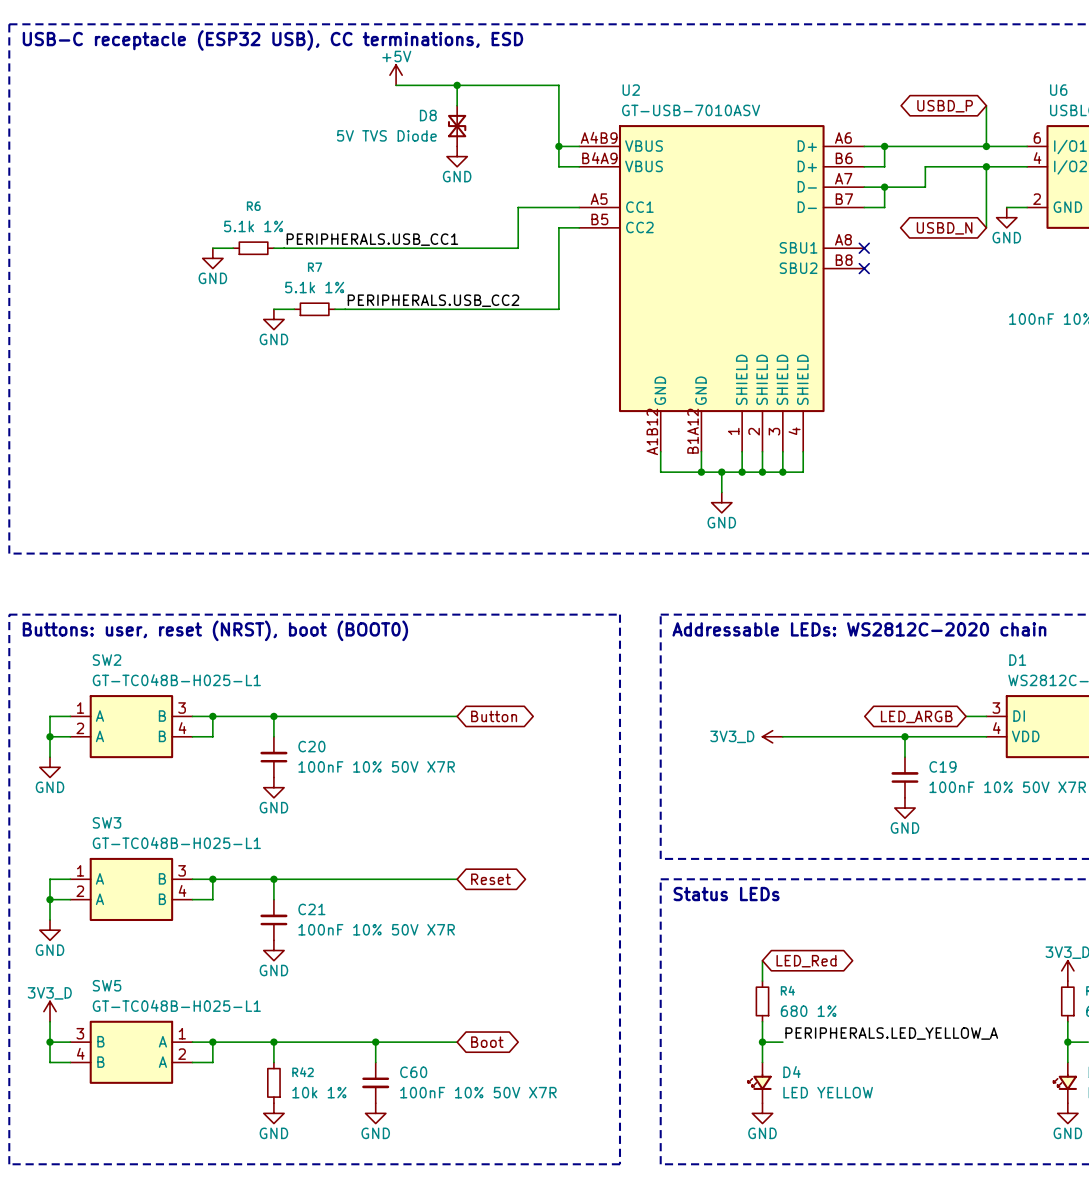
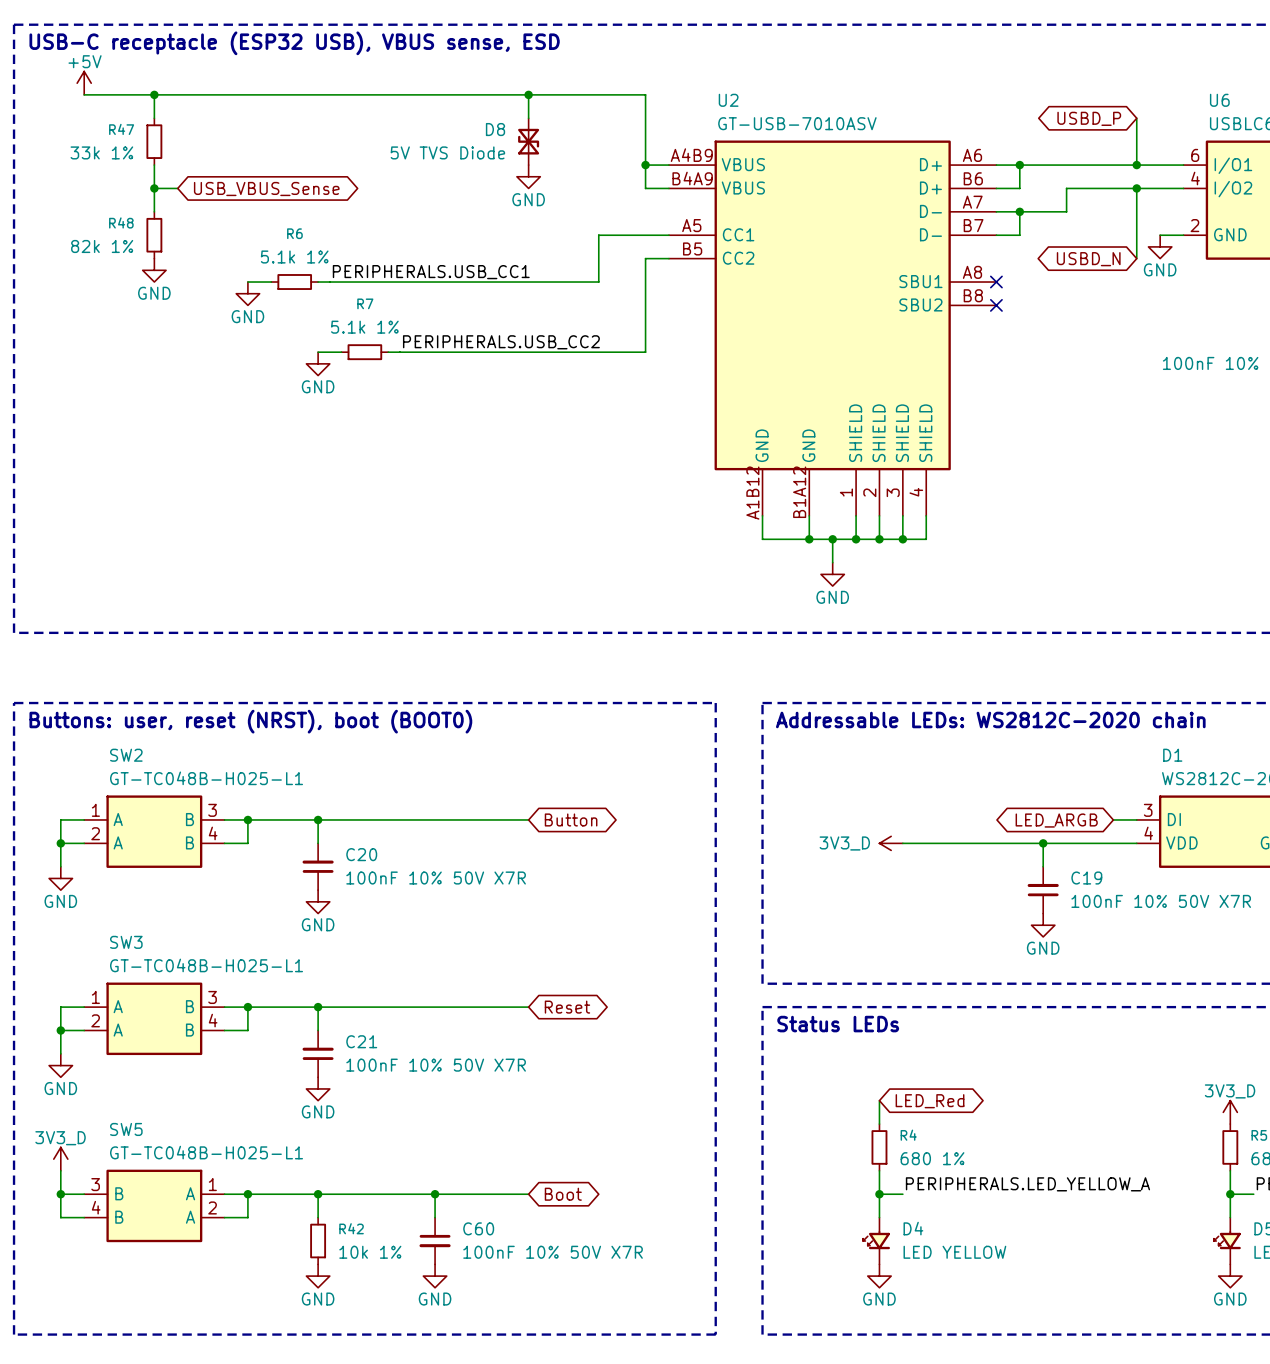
text: USB-C receptacle (ESP32 USB), CC terminations, ESD (272, 40) -> USB-C receptacle (ESP32 USB), VBUS sense, ESD (294, 43)
power symbol: none -> +5V (84, 83)
power symbol: +5V (396, 75) -> none
wire: none -> (84, 94) (458, 94)
wire: none -> (154, 94) (154, 118)
junction: none -> (154, 94)
R47: none -> 33k 1% (154, 141)
wire: none -> (154, 165) (154, 211)
wire: none -> (154, 188) (177, 188)
junction: none -> (154, 188)
global label: none -> USB_VBUS_Sense (266, 189)
R48: none -> 82k 1% (154, 235)
power symbol: none -> GND (154, 270)

